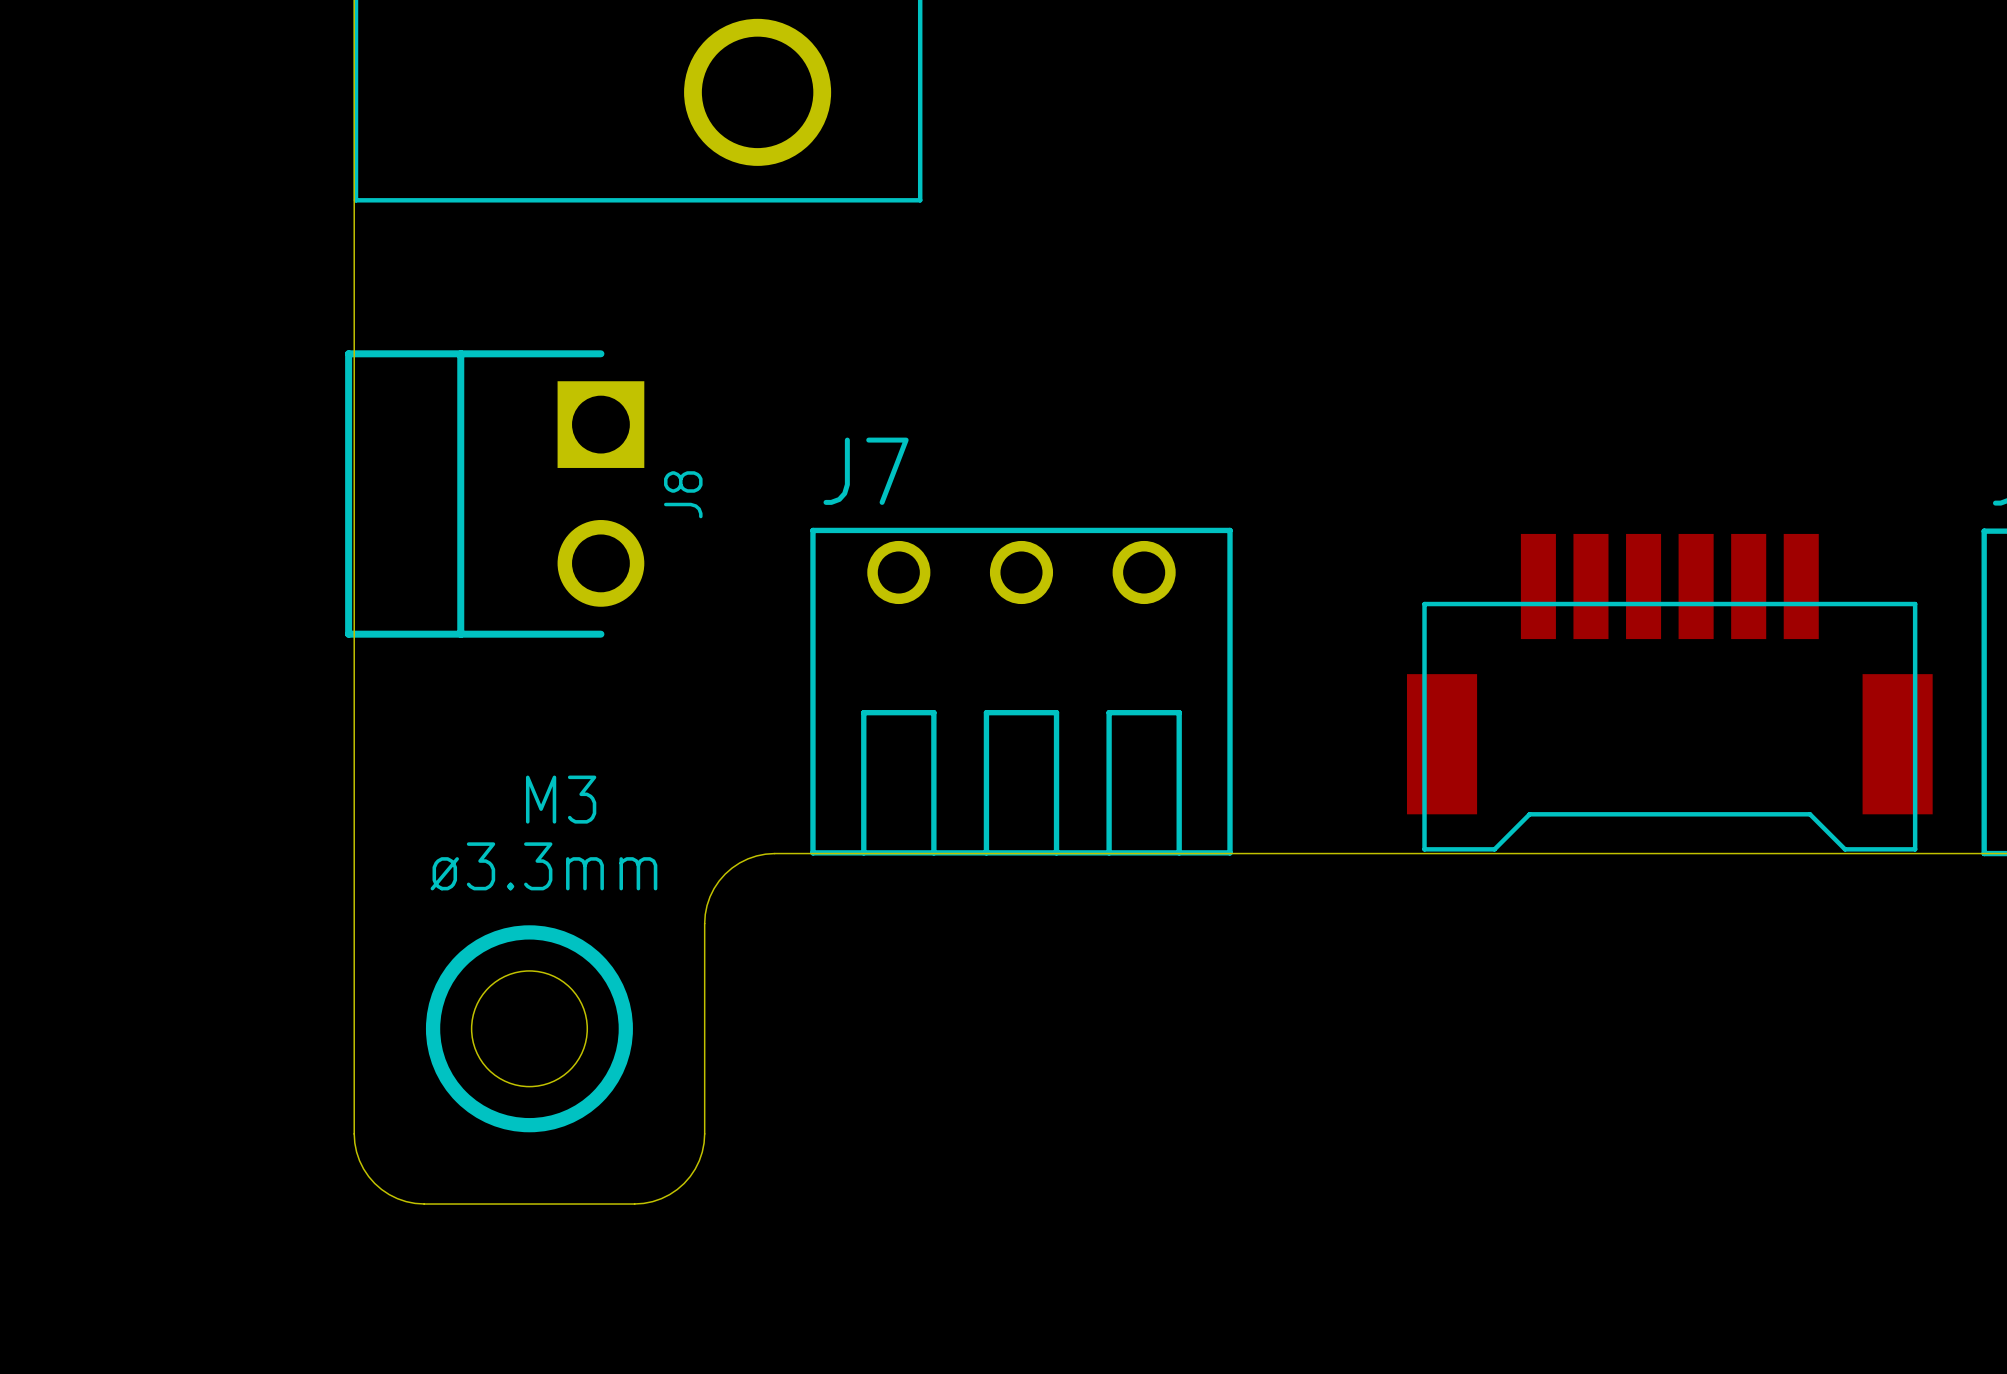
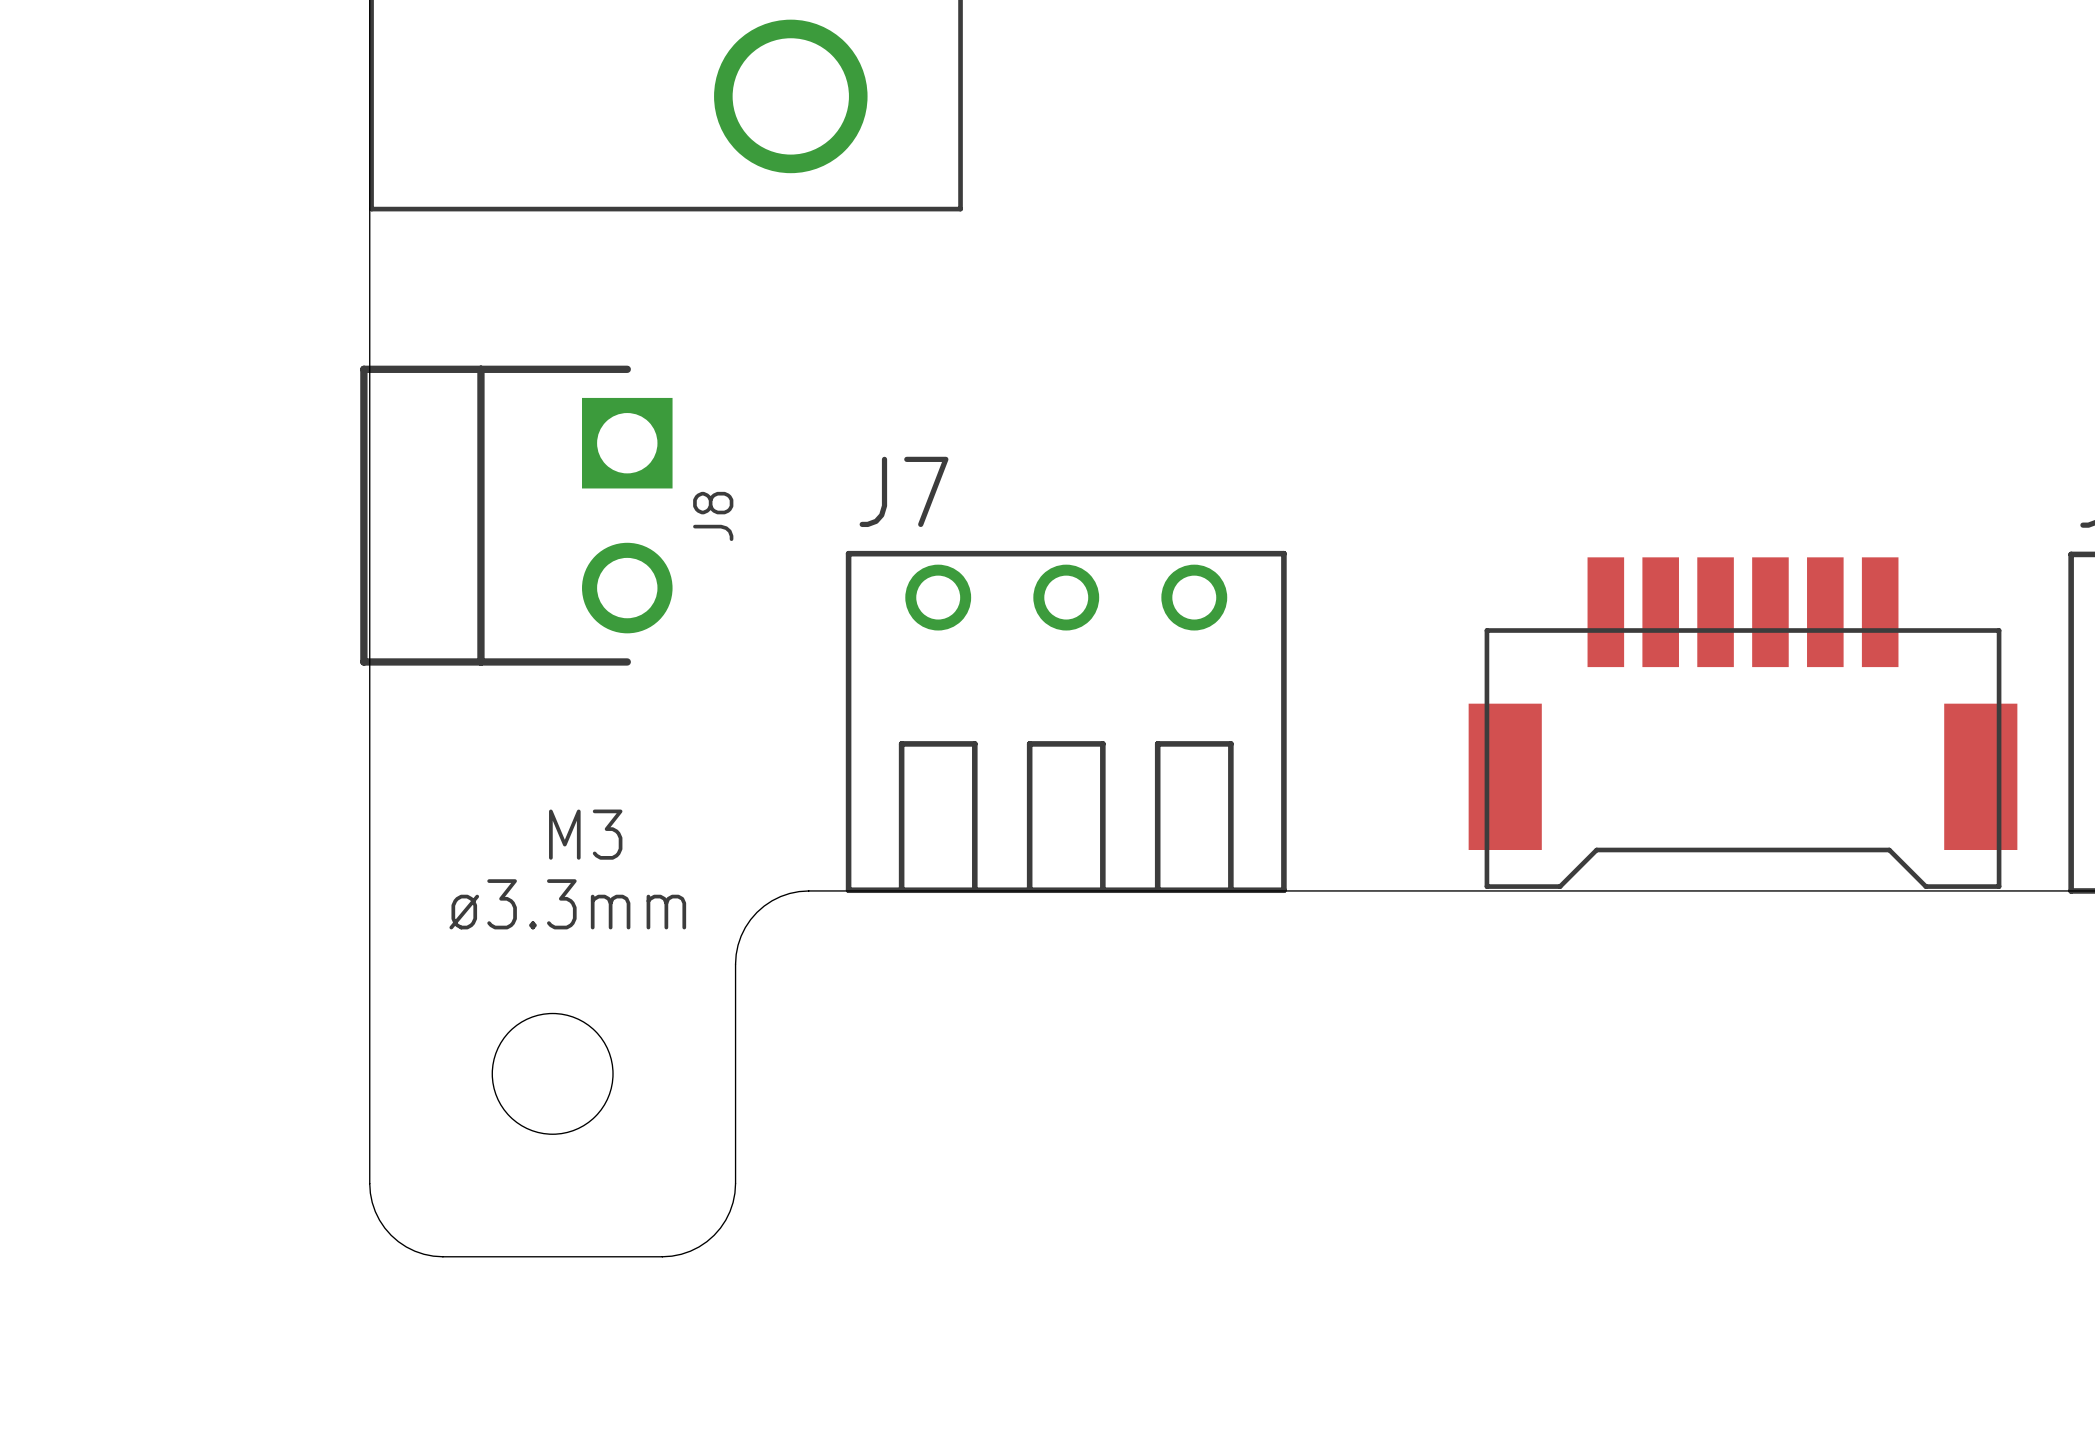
drawing: [425, 925, 633, 1133] -> none

